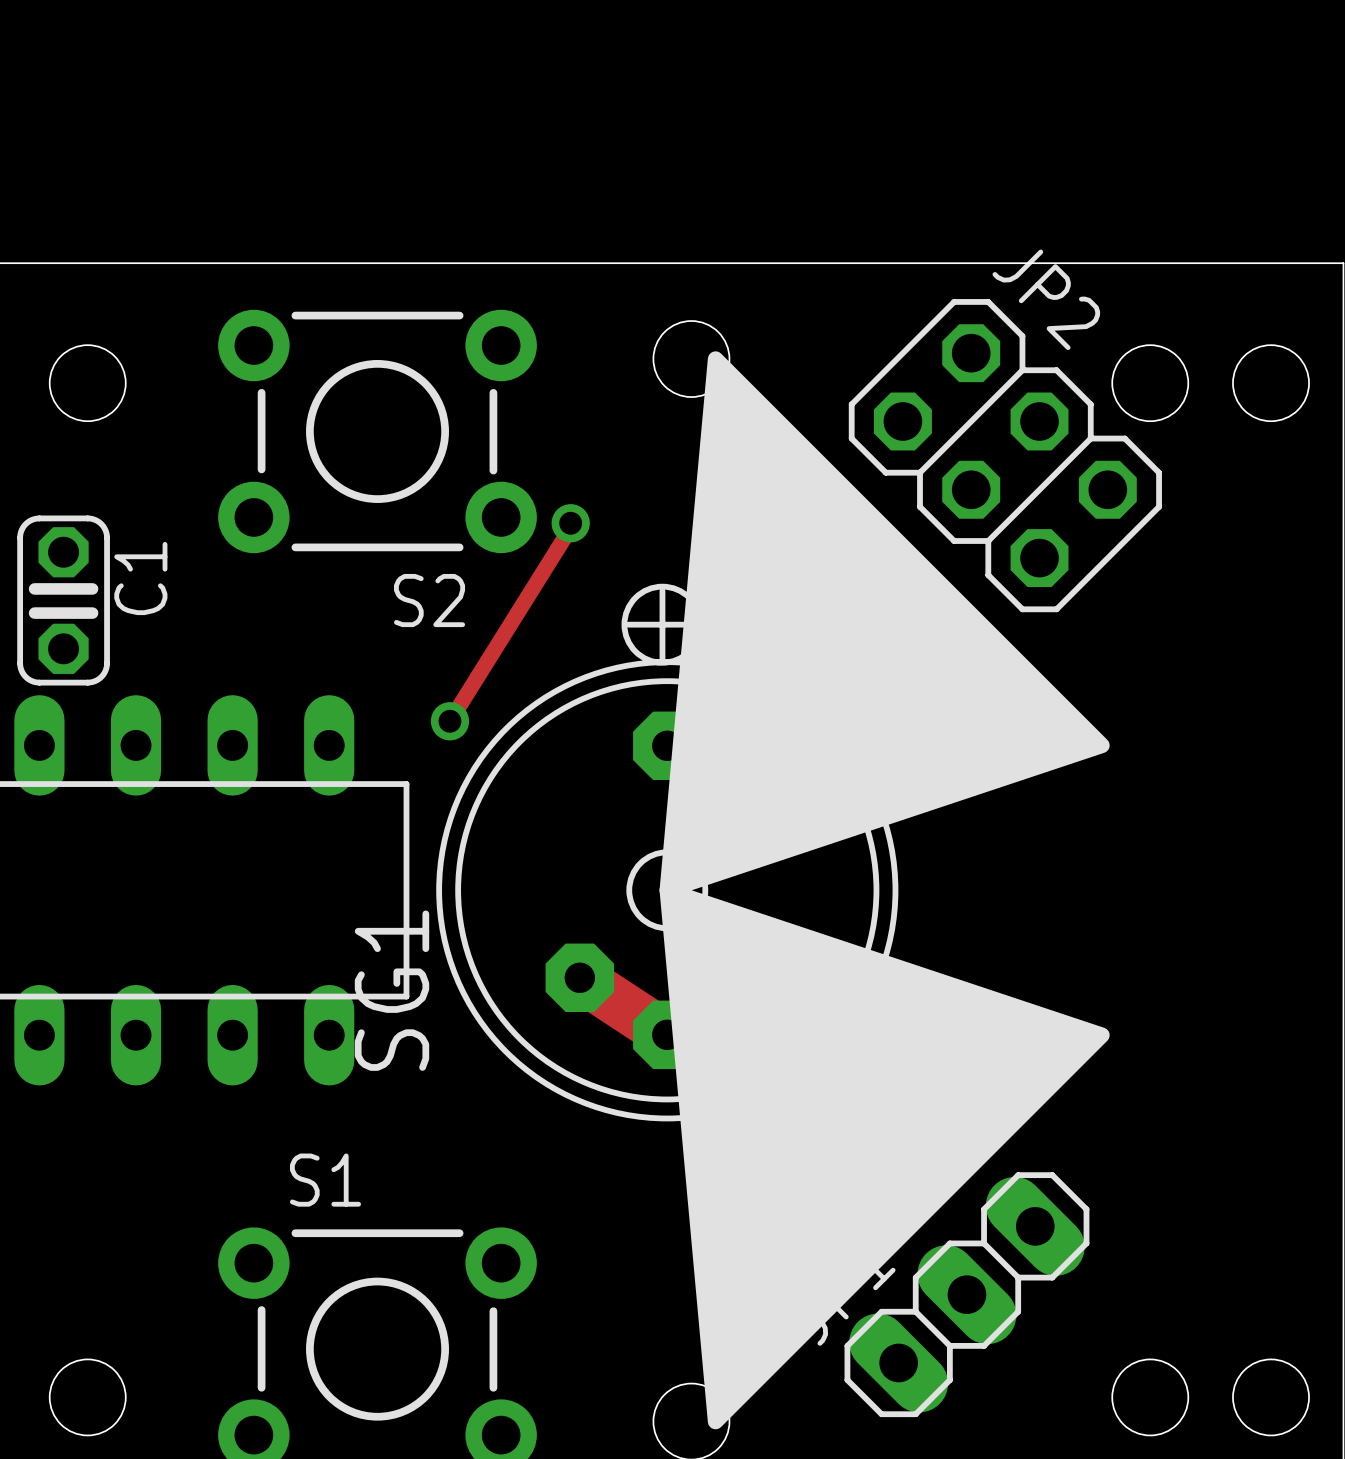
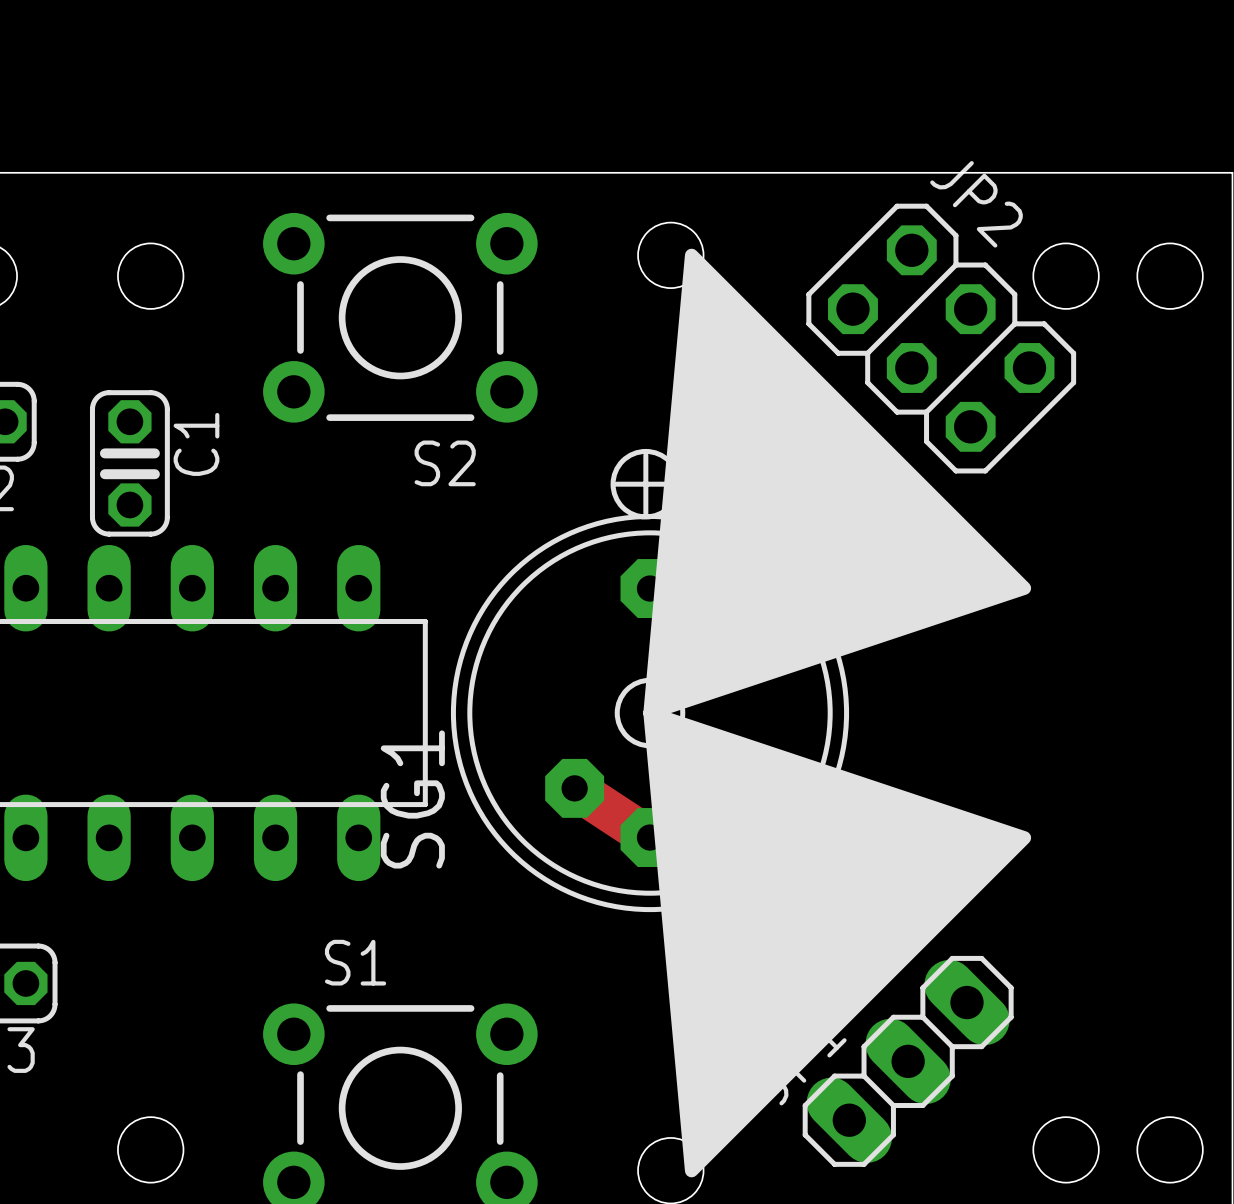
via: (570, 523) -> none
track: (570, 528) (449, 721) -> none
via: (449, 721) -> none

